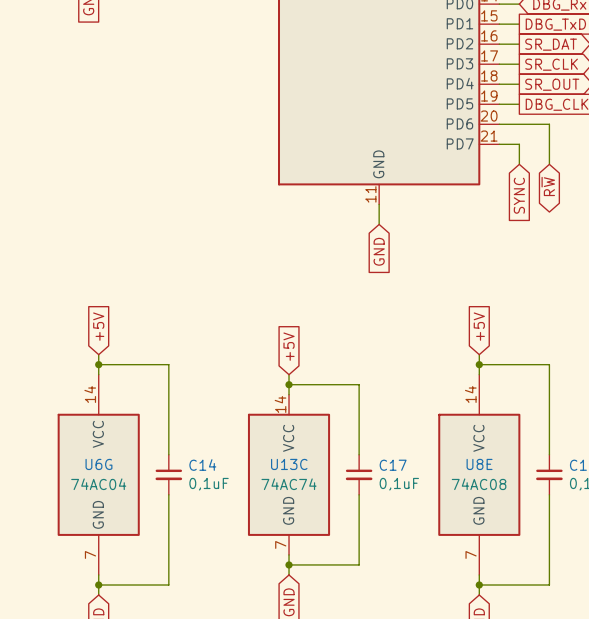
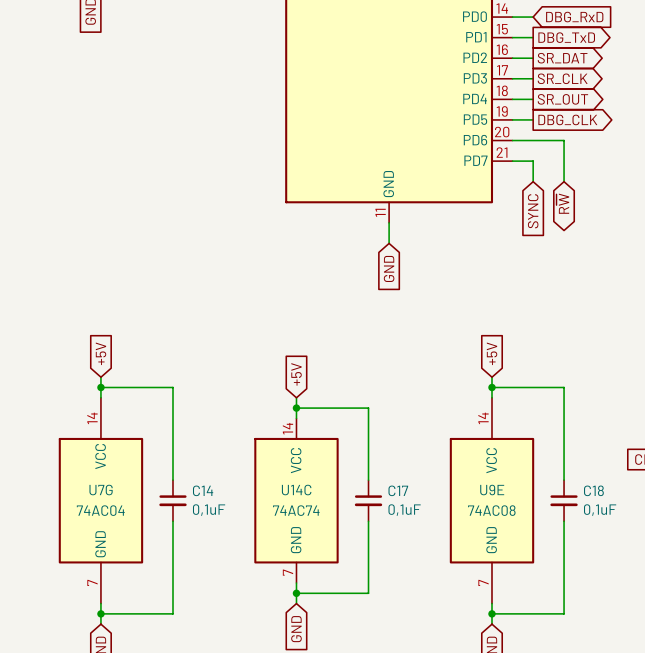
U6G name: U6G (98, 464) -> U7G (101, 490)
U13C name: U13C (289, 464) -> U14C (296, 490)
U8E name: U8E (479, 464) -> U9E (492, 490)

